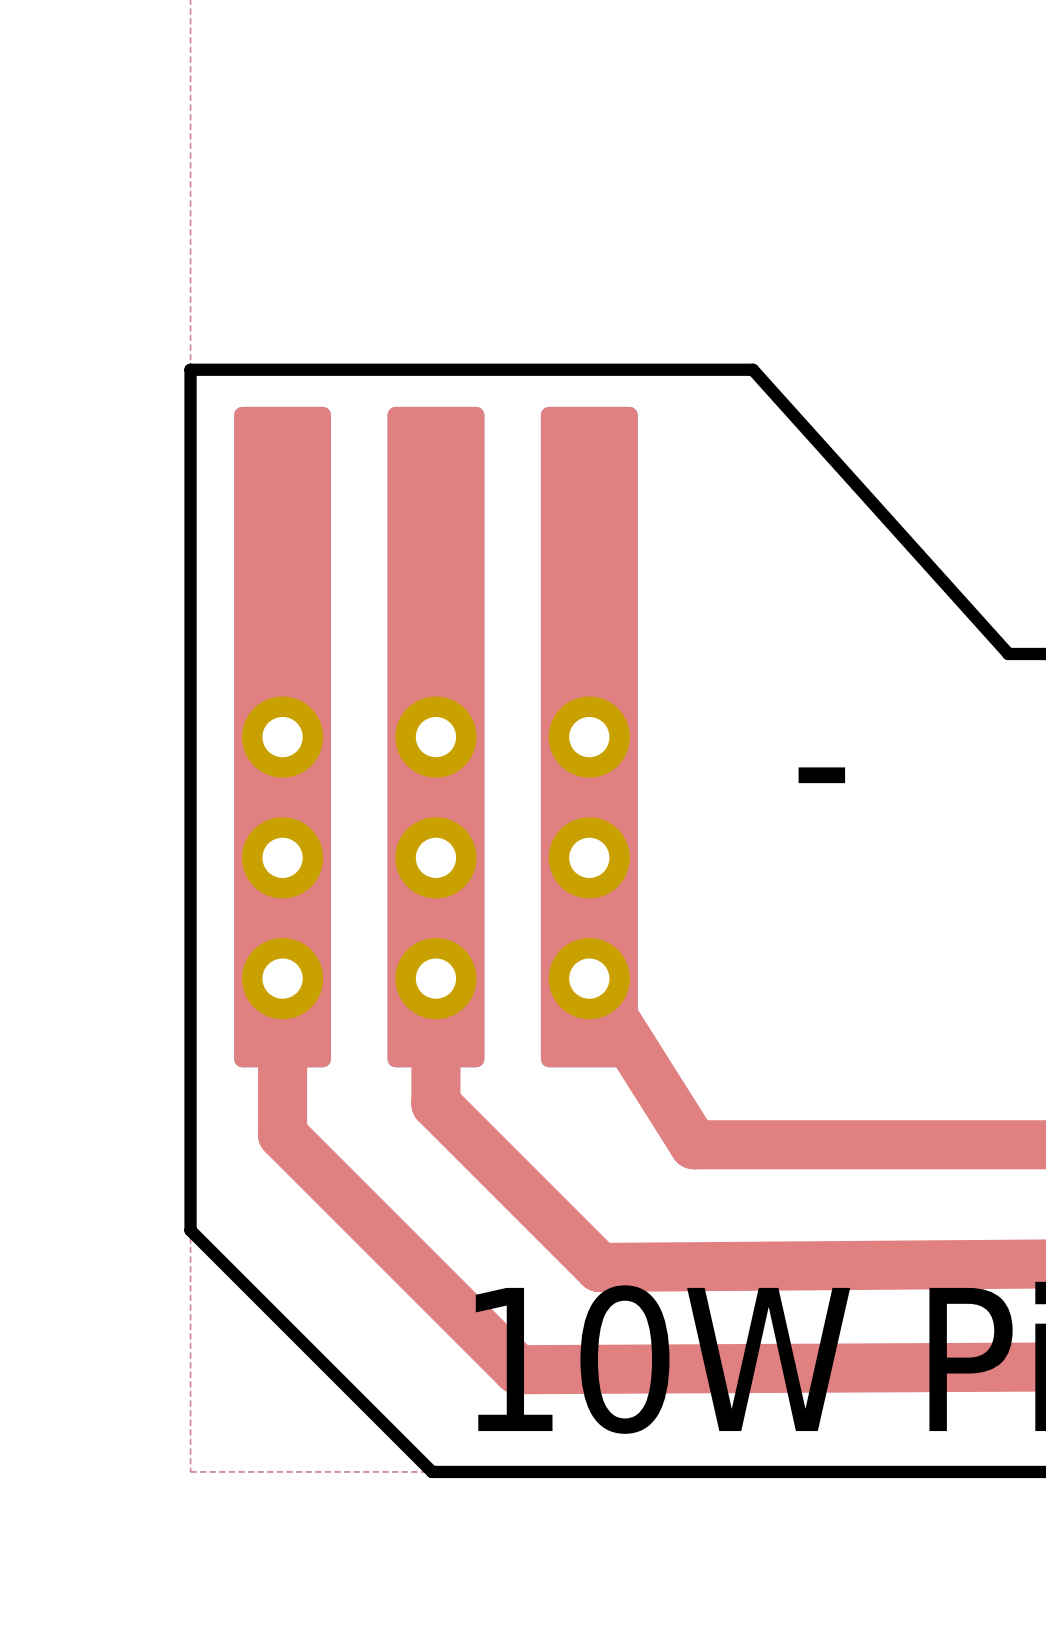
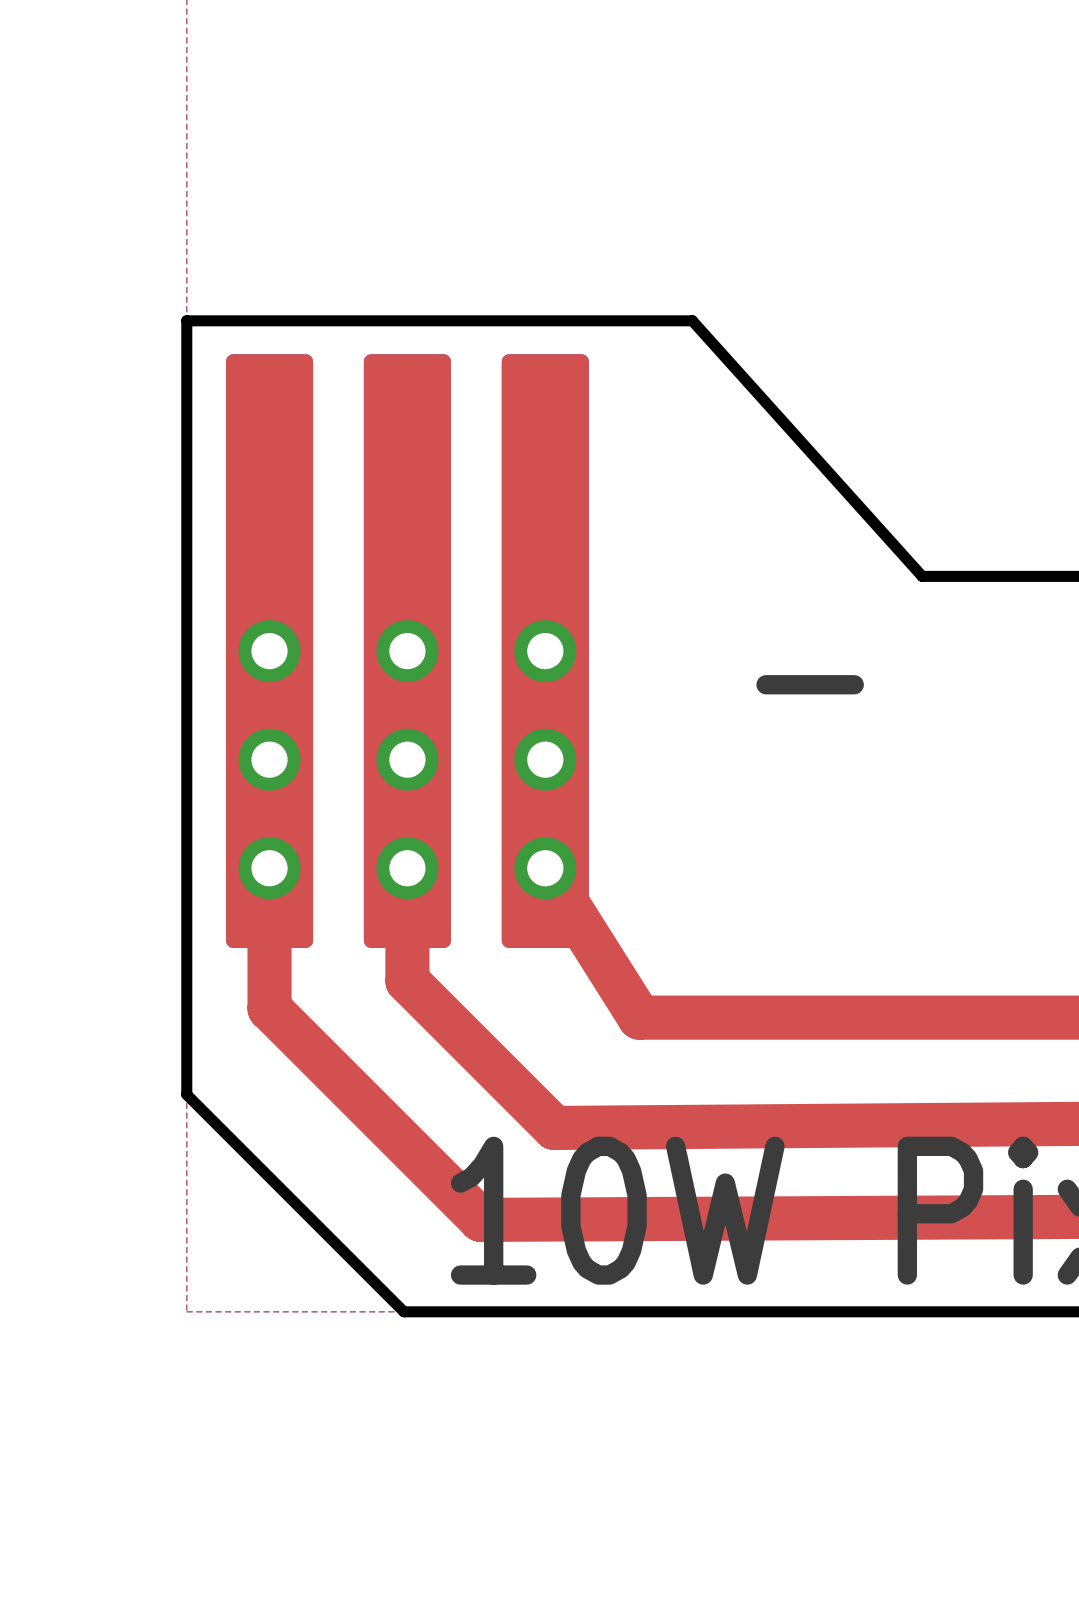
part footprint: [234, 406, 332, 1068] -> [225, 354, 314, 948]
part footprint: [387, 406, 485, 1068] -> [363, 354, 451, 948]
part footprint: [540, 406, 638, 1068] -> [501, 354, 589, 948]

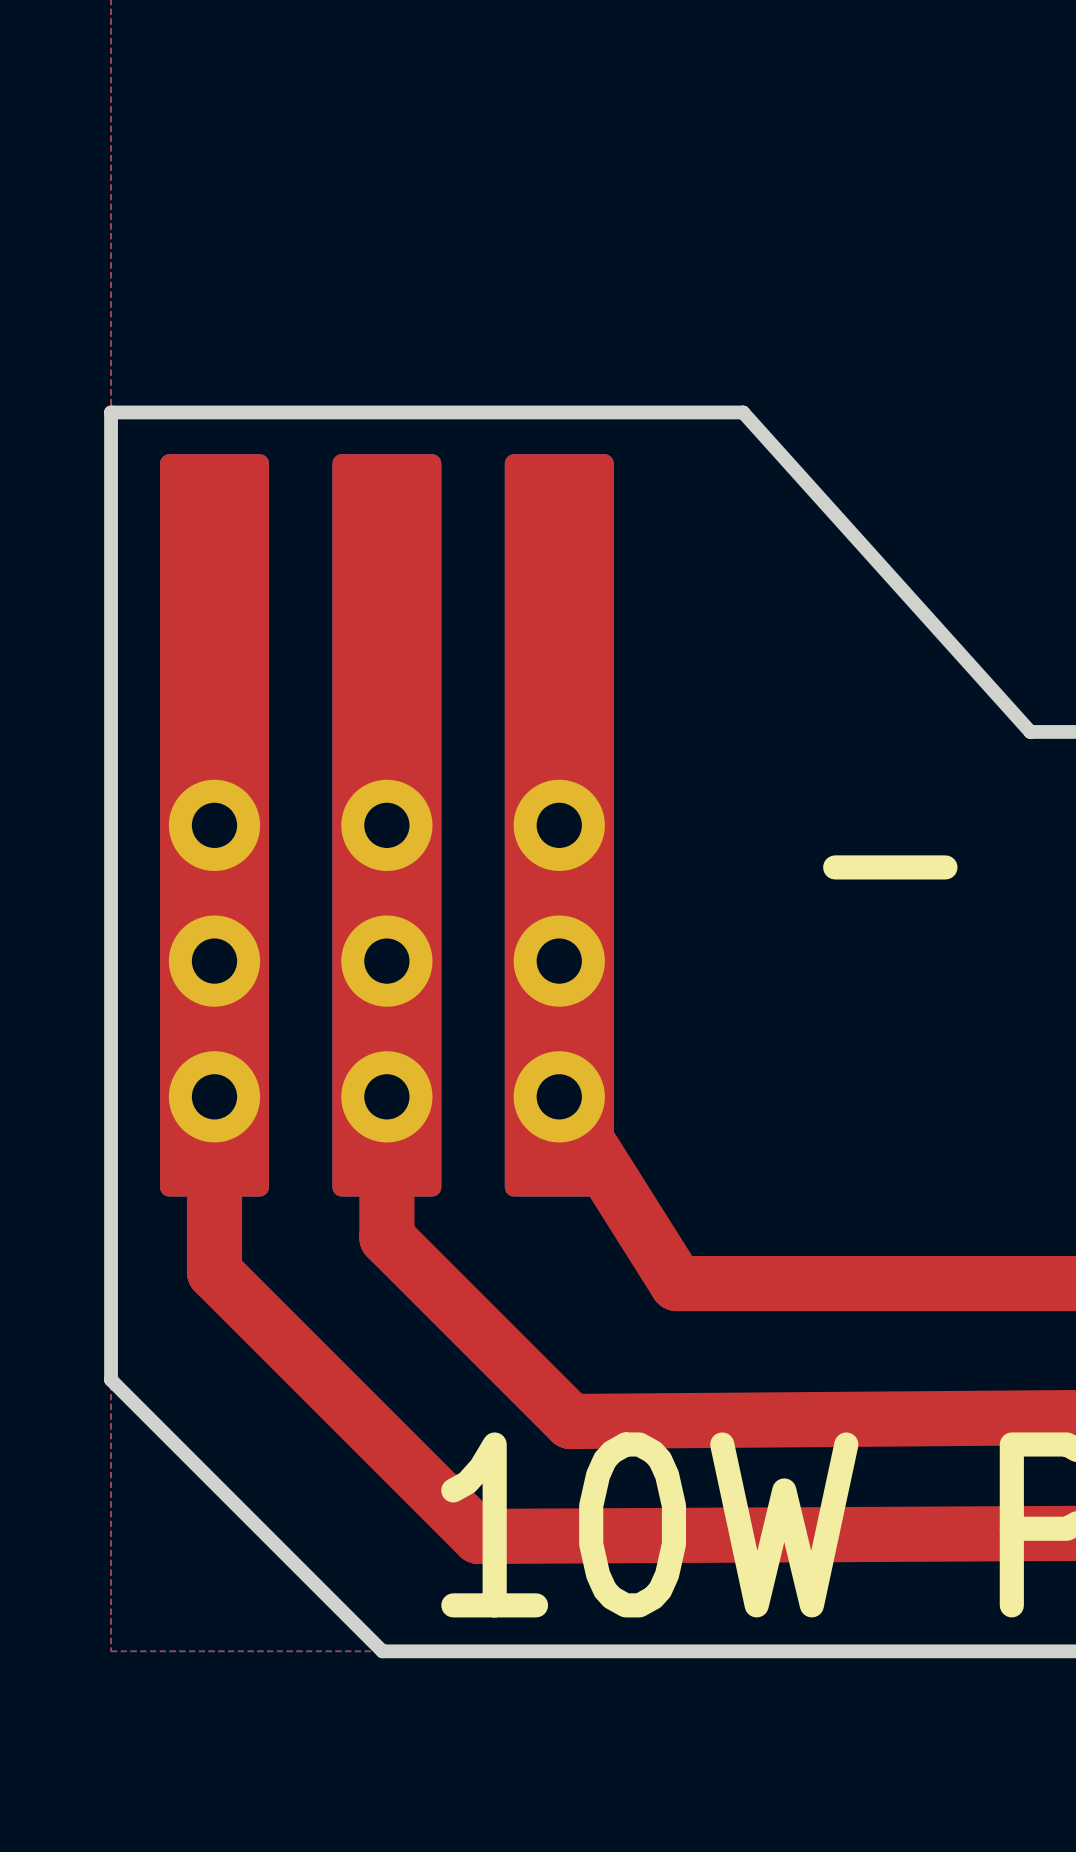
part footprint: [225, 354, 314, 948] -> [160, 454, 269, 1197]
part footprint: [363, 354, 451, 948] -> [332, 454, 442, 1197]
part footprint: [501, 354, 589, 948] -> [504, 454, 614, 1197]

